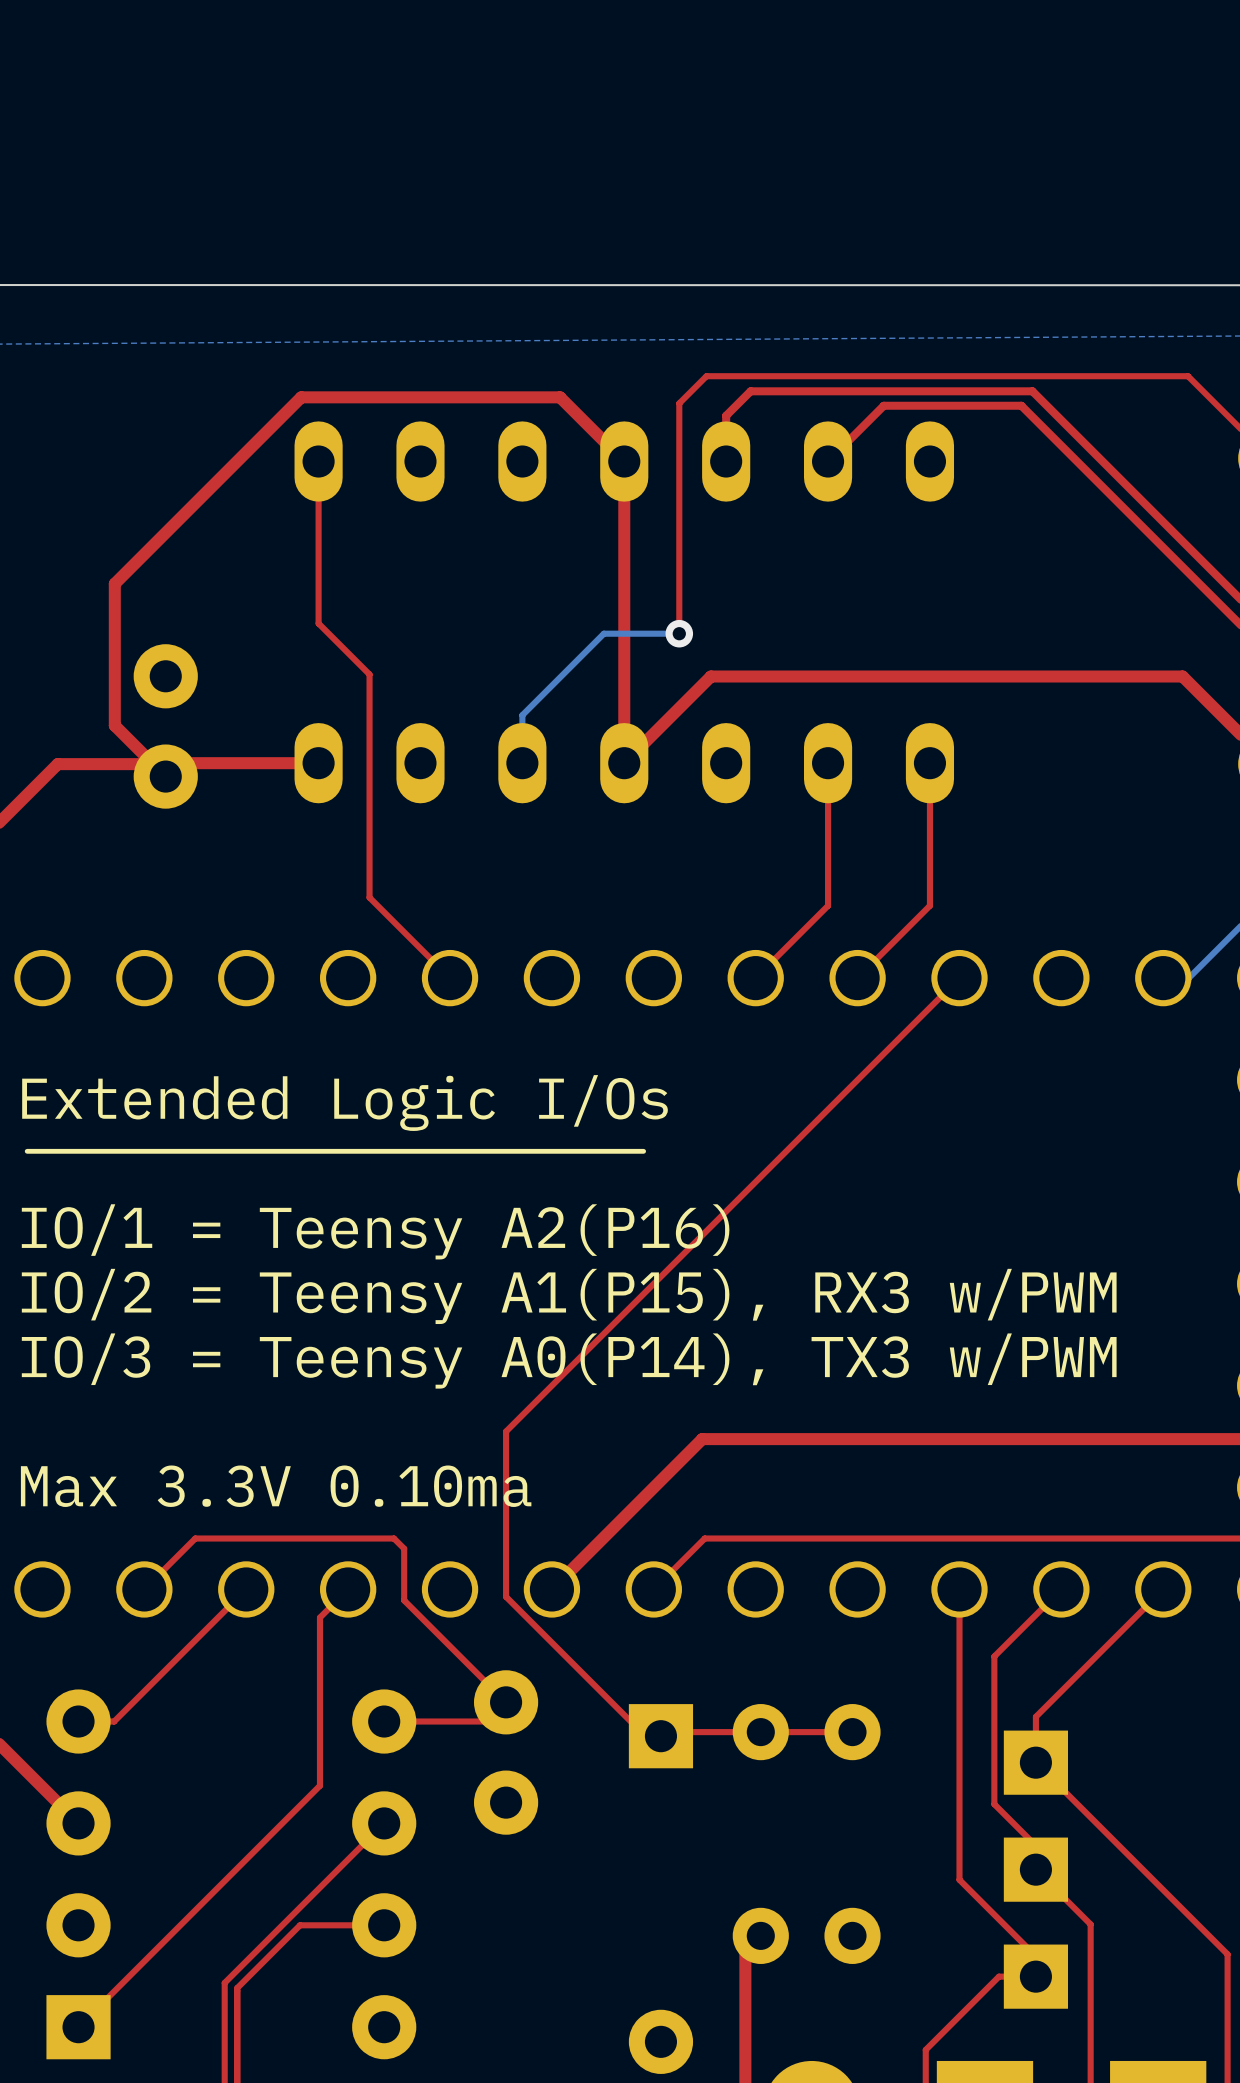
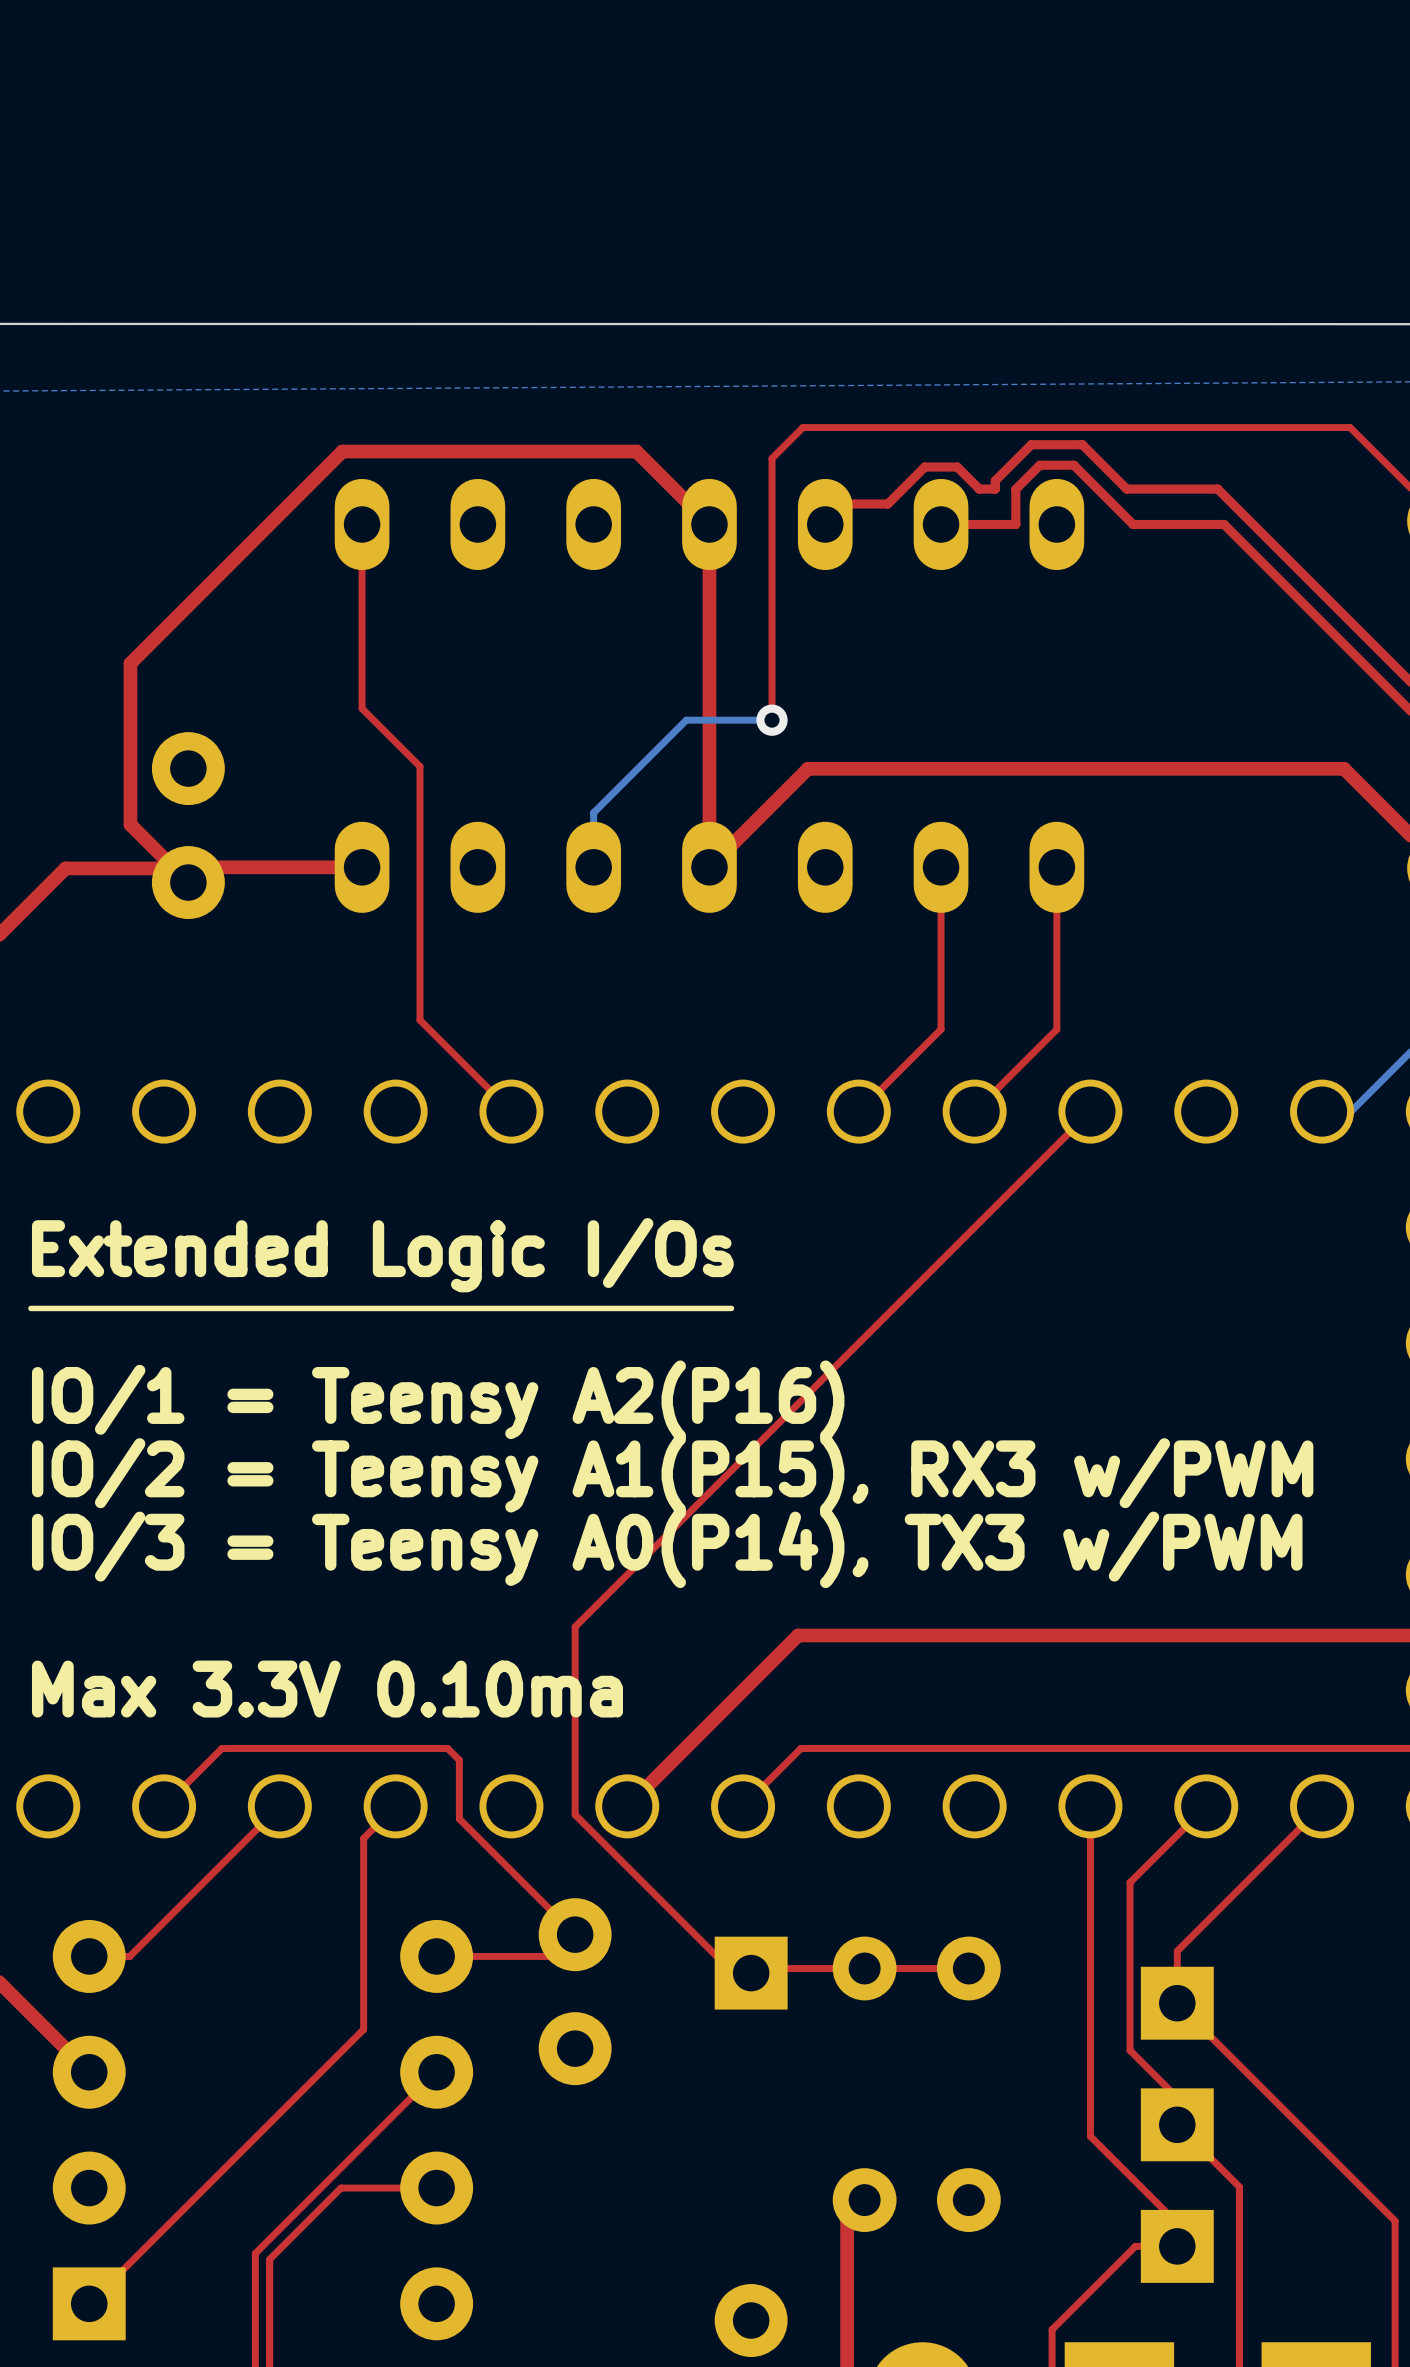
top track: (907, 391) (750, 391) (726, 415) (726, 461) -> (1031, 444) (995, 480) (995, 489) (979, 489) (957, 467) (924, 467) (887, 503) (845, 503)
top track: (952, 391) (1032, 391) (1071, 430) -> (1082, 444) (1126, 489) (1217, 489)
top track: (1077, 461) (1021, 405) (883, 405) (828, 461) -> (1224, 524) (1133, 524) (1073, 465) (1039, 465) (1015, 489) (1015, 524) (941, 524)

